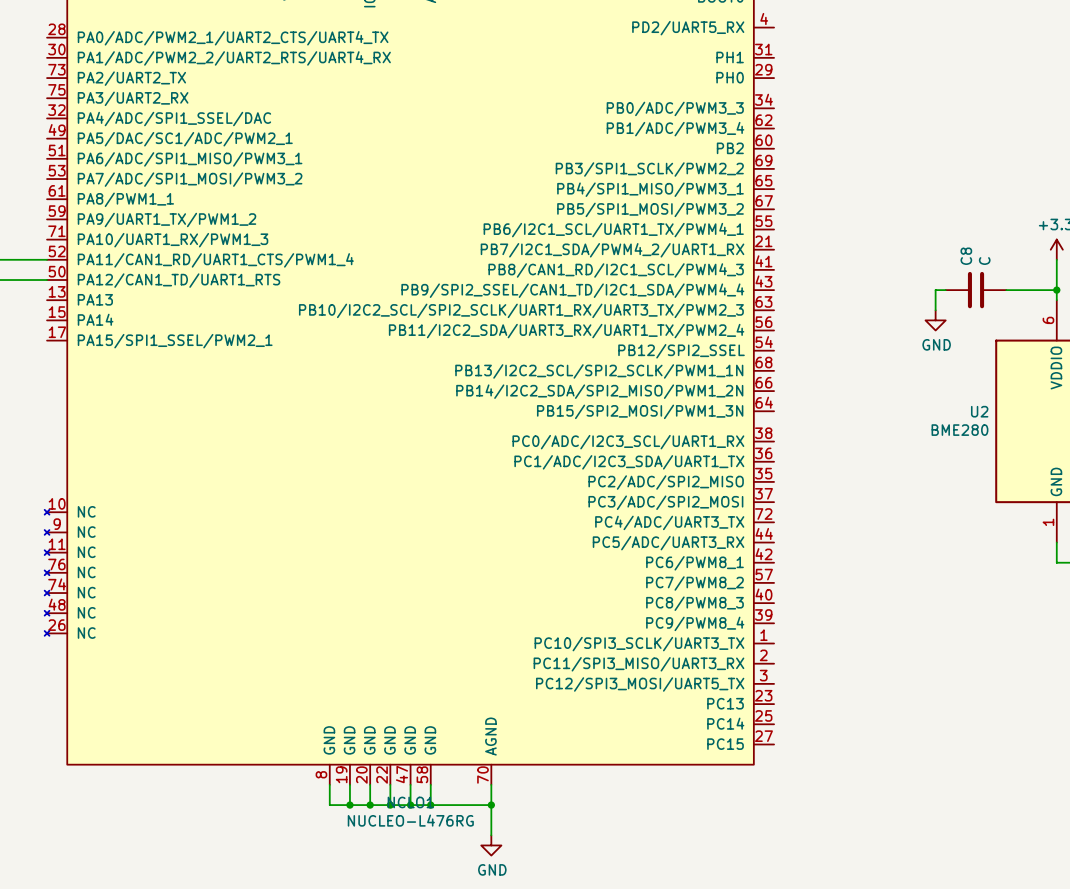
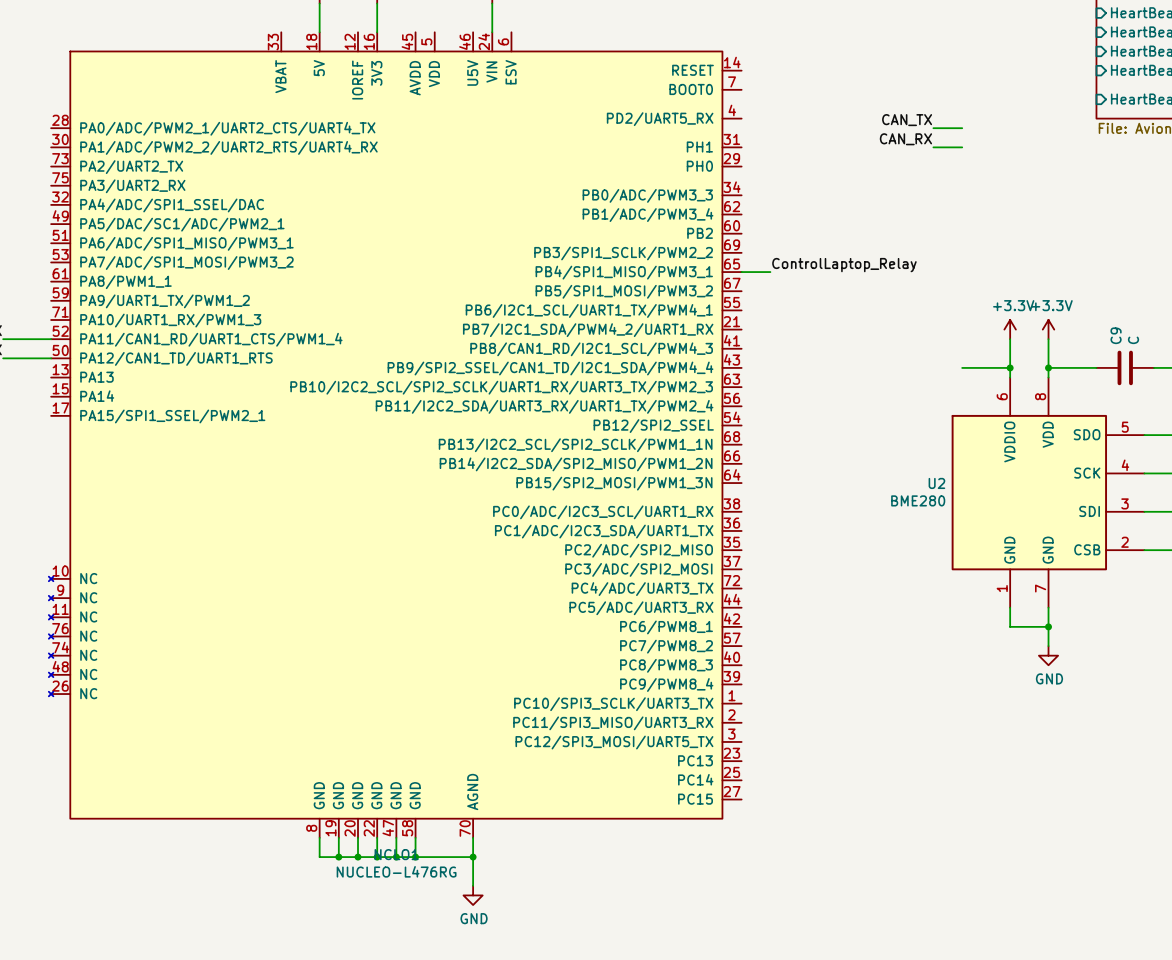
label: none -> CAN_TX (907, 120)
wire: none -> (933, 128) (962, 128)
label: none -> CAN_RX (905, 139)
wire: none -> (933, 147) (962, 147)
label: none -> ControlLaptop_Relay (844, 265)
wire: none -> (741, 272) (770, 272)
wire: (945, 290) (935, 290) (935, 310) -> none
C8: C (976, 290) -> none
power symbol: GND (935, 320) -> none

